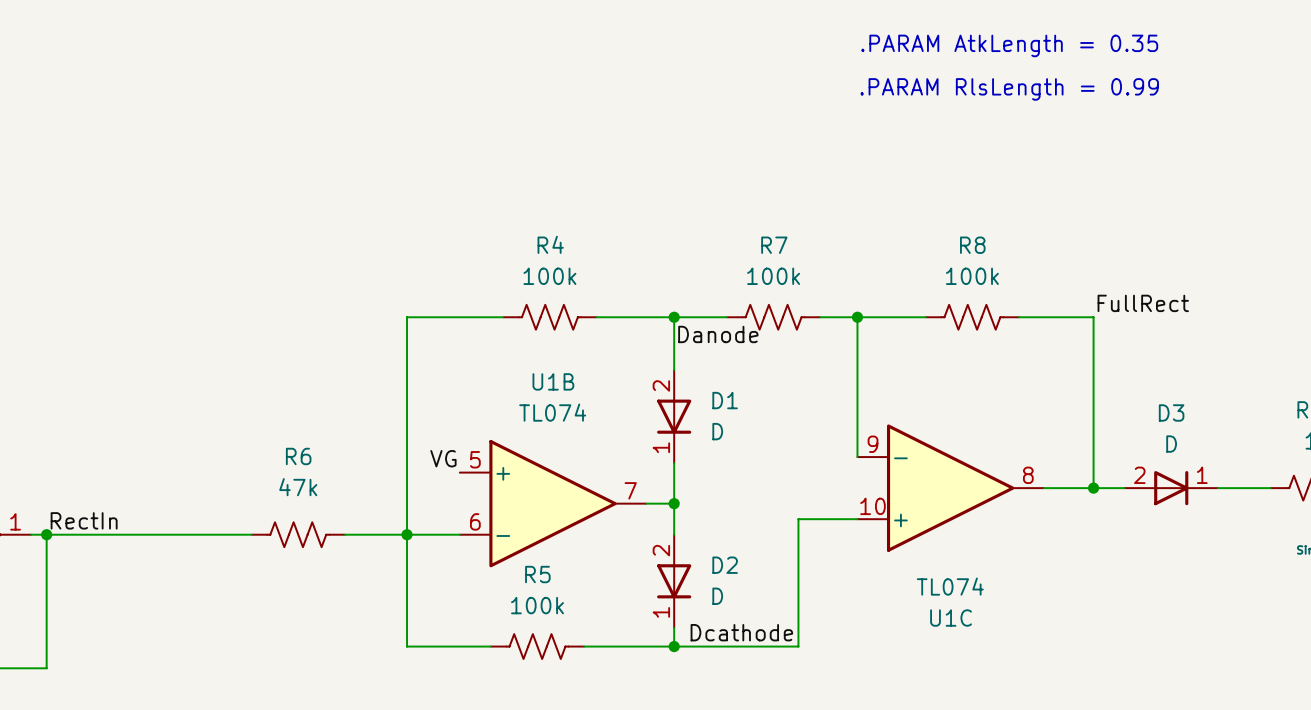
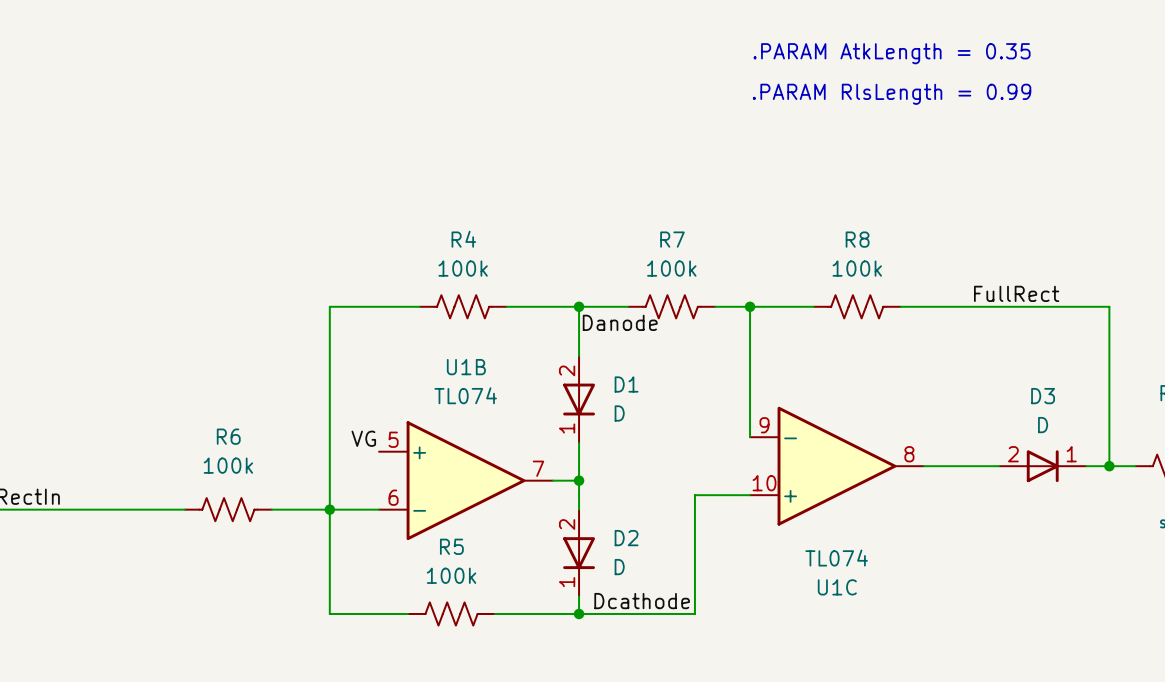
wire: (1093, 317) (1093, 488) -> (970, 306) (1109, 306) (1109, 466)
R6 value: 47k (298, 487) -> 100k (228, 465)
junction: (1093, 488) -> none
junction: none -> (1109, 466)

